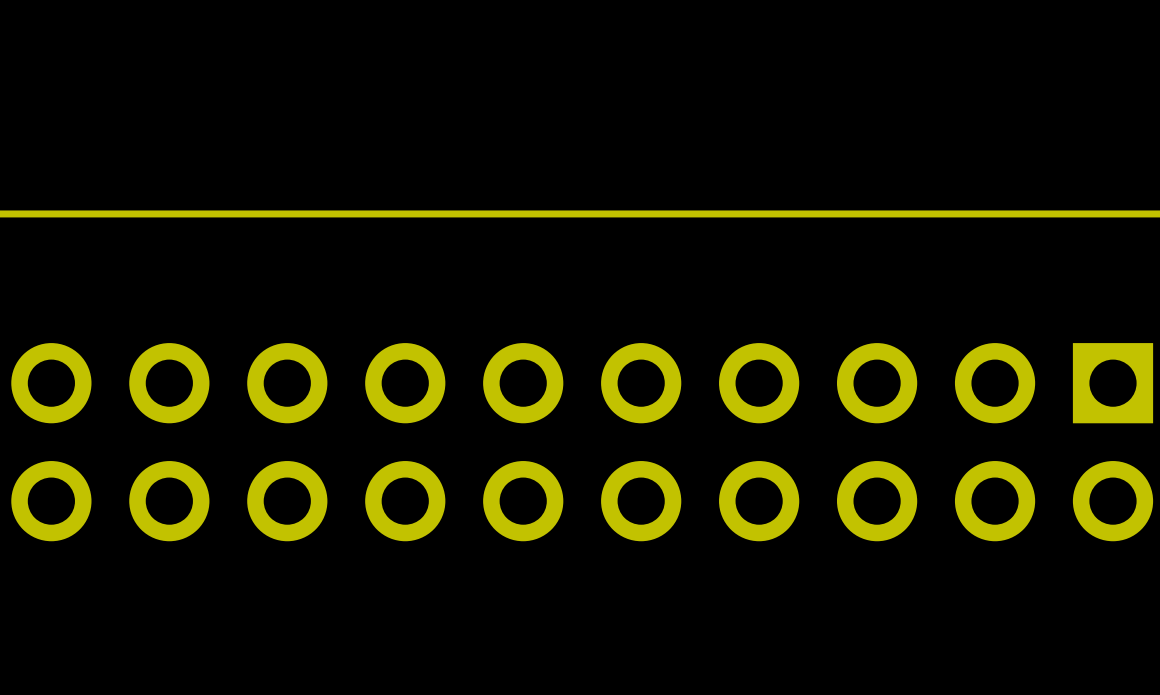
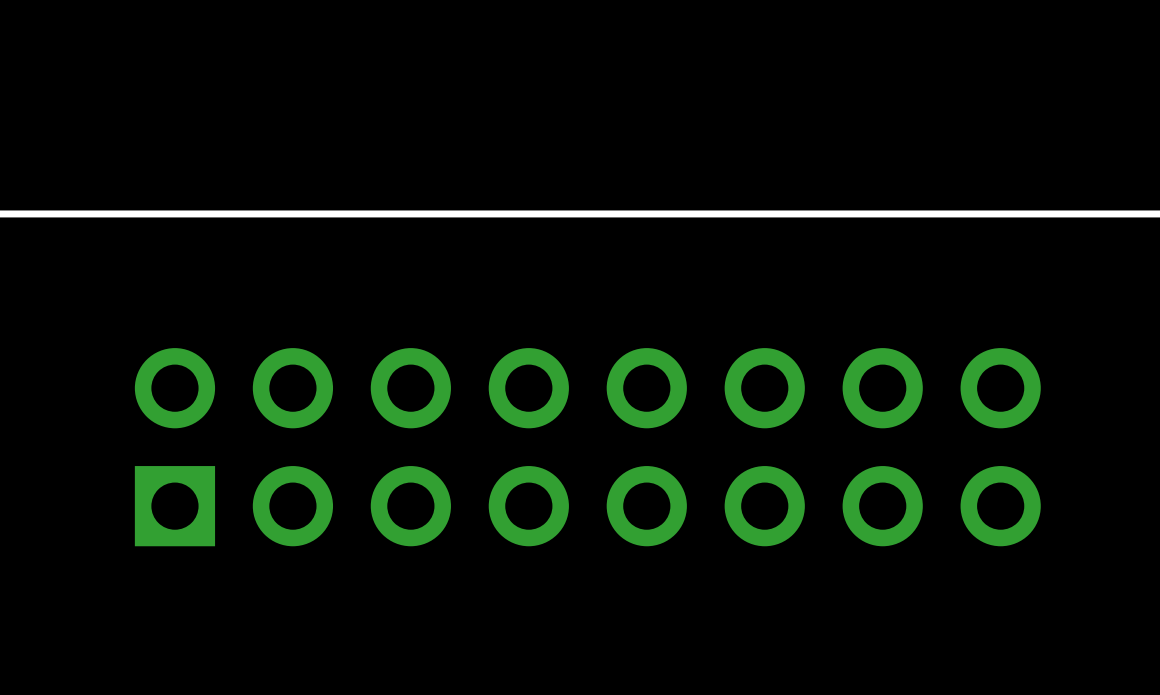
part footprint: [11, 343, 1154, 542] -> [134, 348, 1041, 547]

